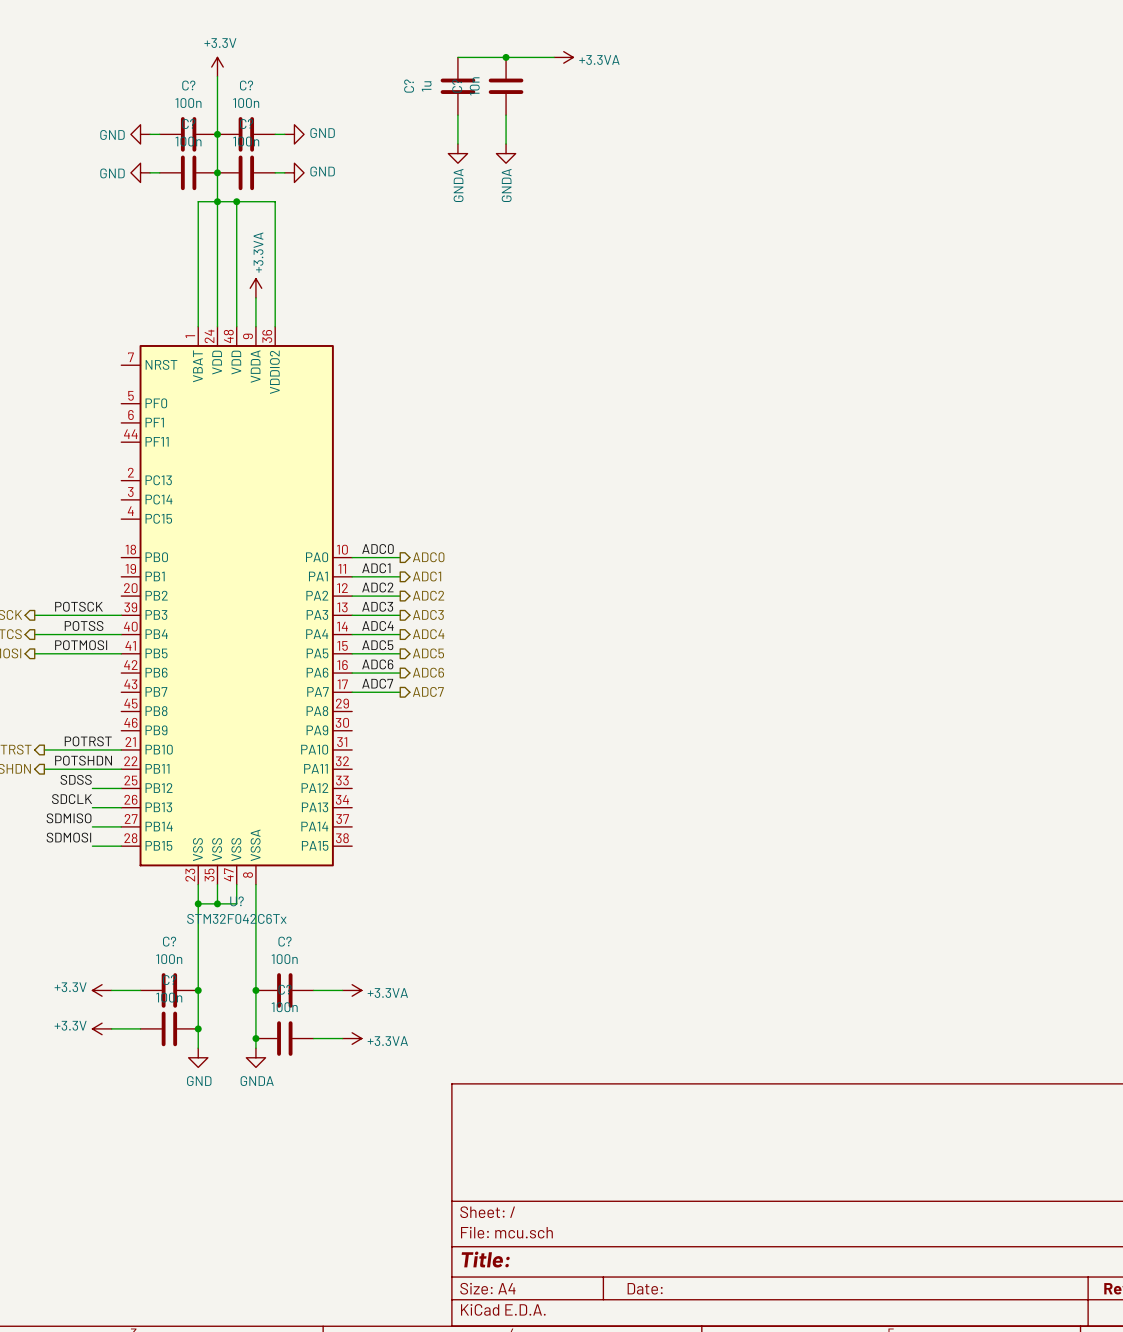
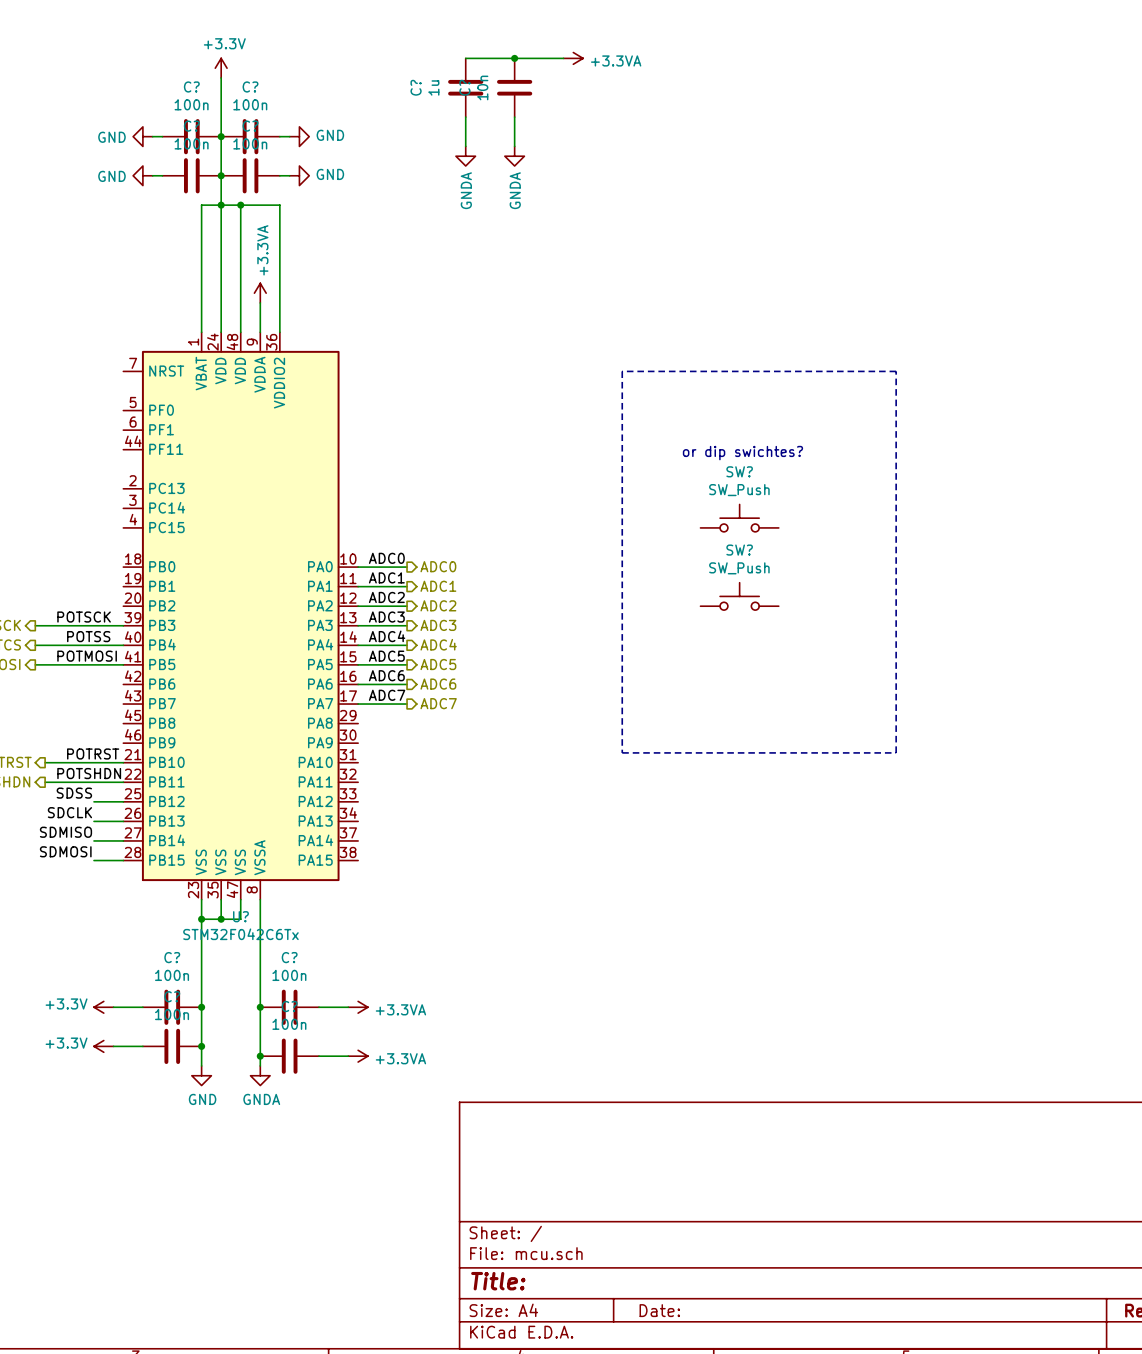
line: none -> (622, 371) (896, 371) (896, 752) (622, 752) (622, 371)
text: none -> or dip swichtes? (742, 453)
SW?: none -> SW_Push (739, 518)
SW?: none -> SW_Push (739, 596)

